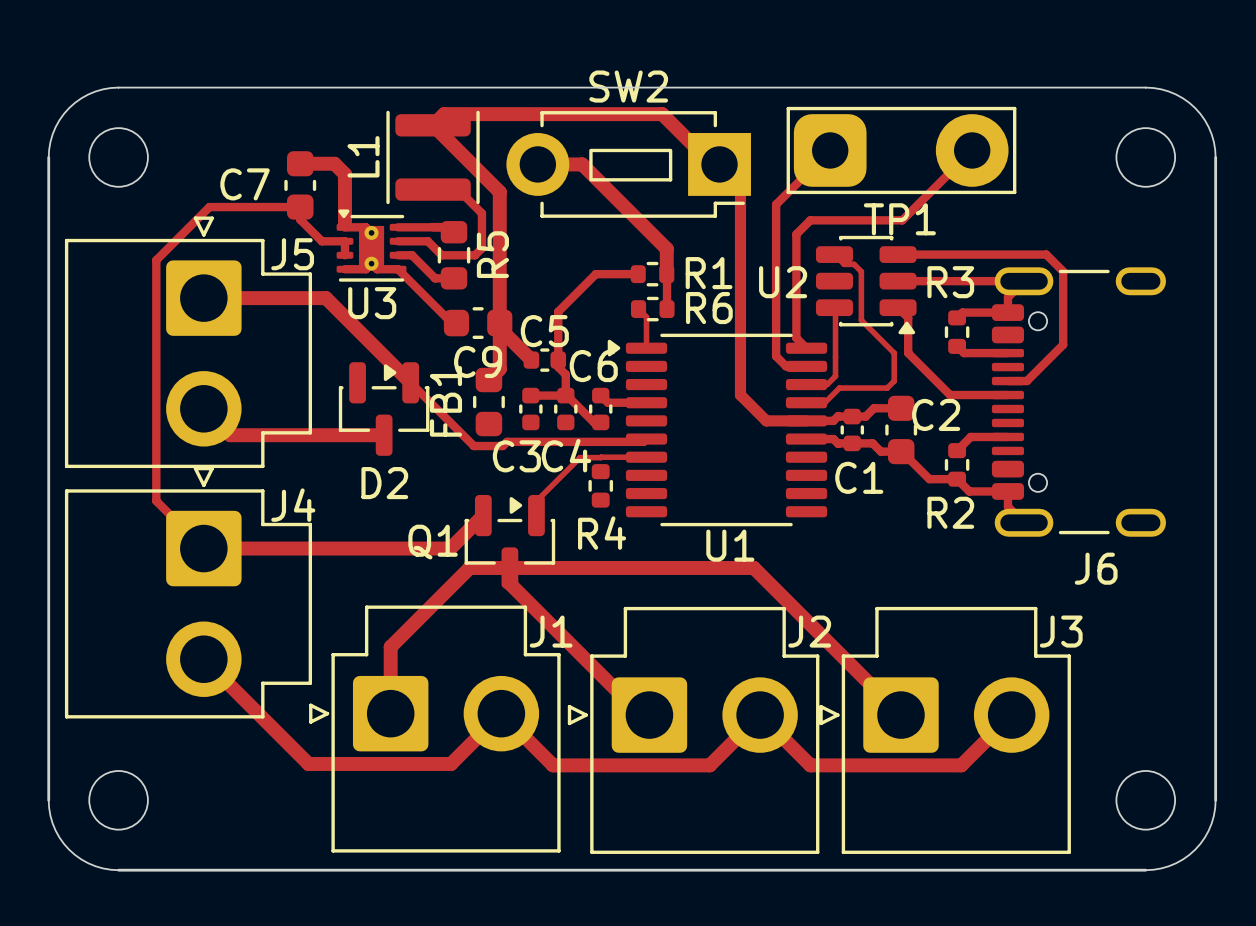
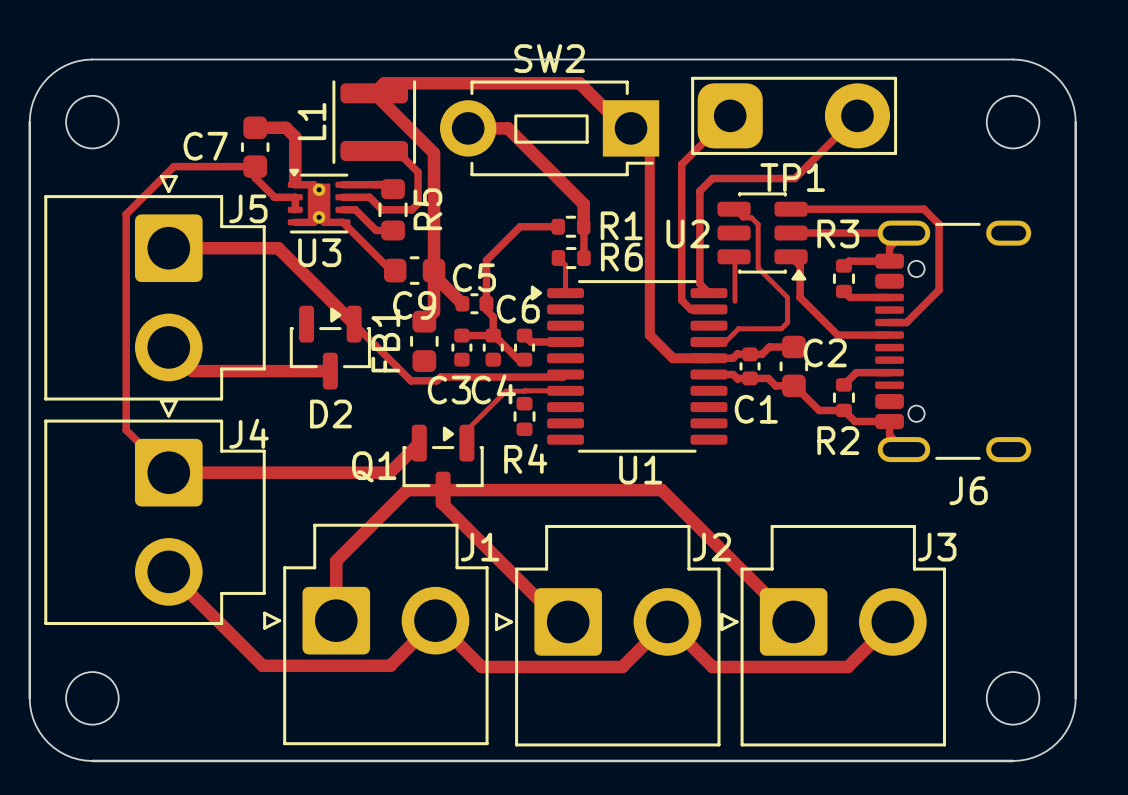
track: (835, 357) (835, 376) (827, 384) (806, 384) -> none

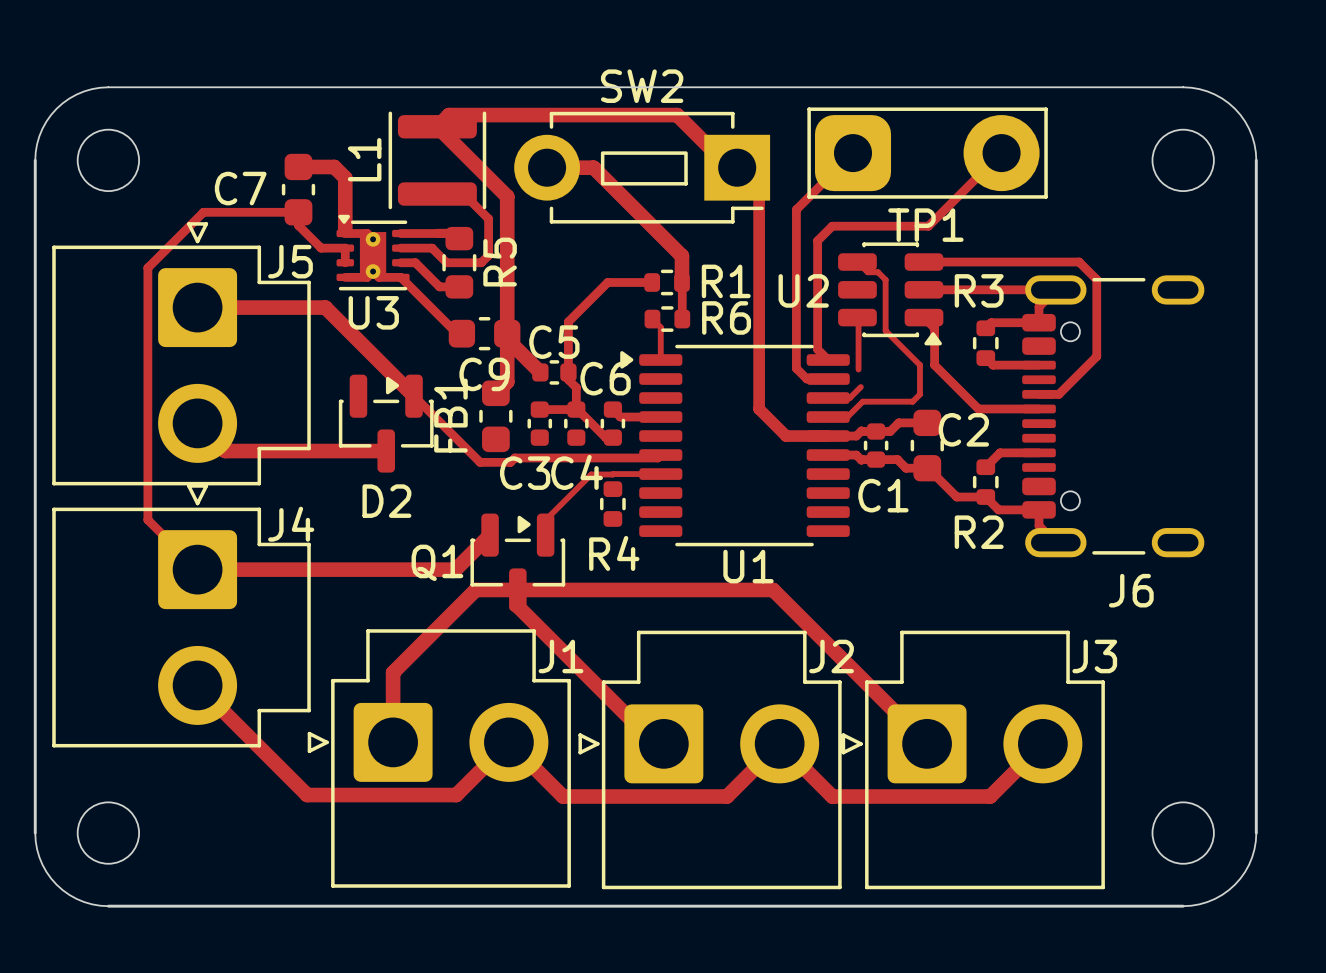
track: none -> (860, 387) (849, 398) (828, 398)

